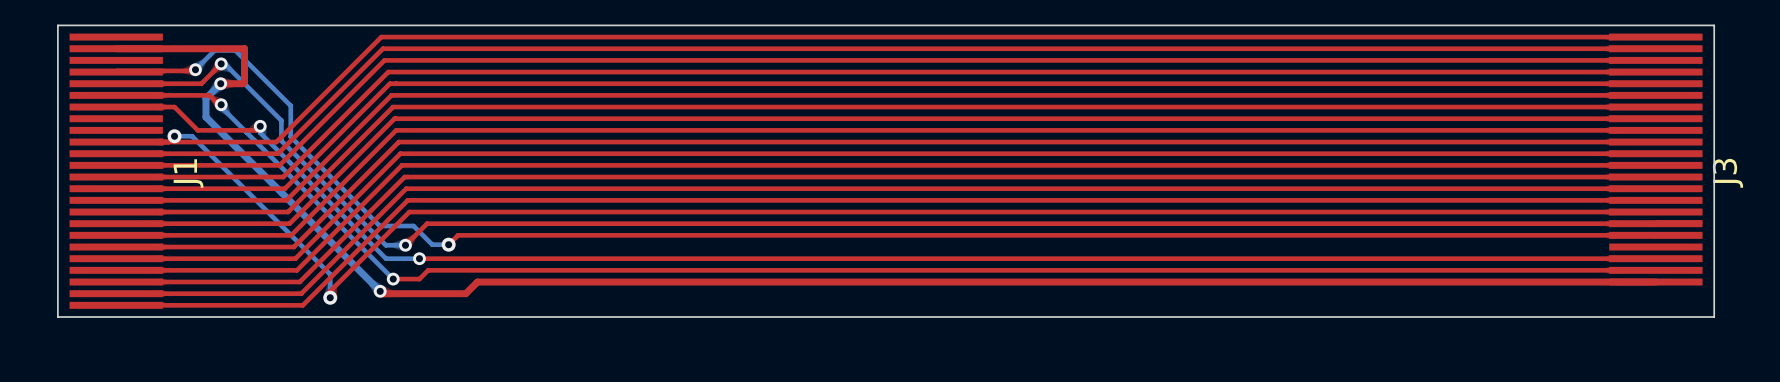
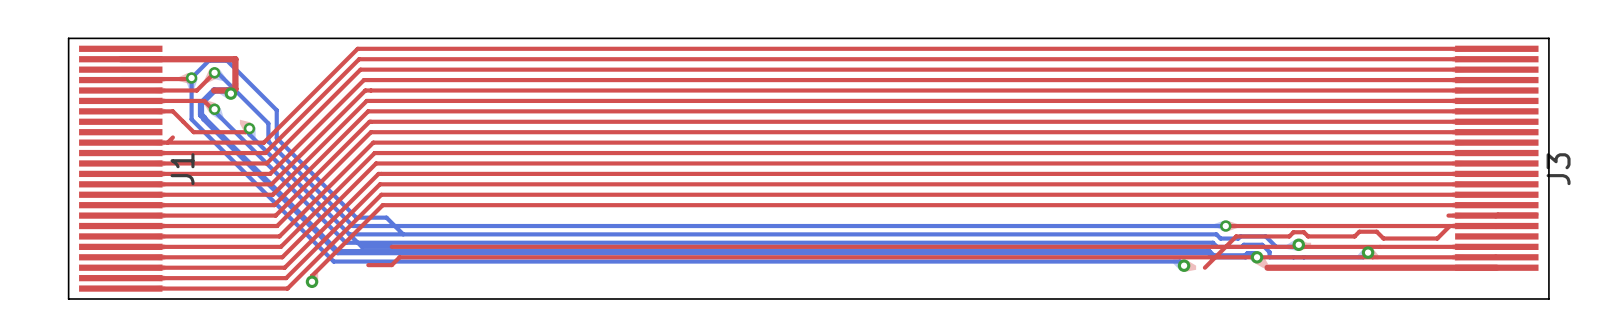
bottom track: none -> (191, 77) (191, 119) (333, 261) (1179, 261) (1184, 265)
via: (220, 83) -> none
bottom track: (206, 111) (206, 117) (380, 291) -> (201, 114) (337, 252) (1209, 252) (1213, 256) (1245, 256) (1247, 254) (1253, 254) (1257, 257)
bottom track: (174, 136) (192, 136) (330, 274) (330, 297) -> none
via position: (174, 136) -> (230, 93)
top track: (1601, 223) (427, 223) (405, 245) -> none
bottom track: (375, 235) (385, 245) (405, 245) -> (352, 226) (1225, 226)
top track: (1352, 235) (457, 235) (448, 244) -> none
via: none -> (1225, 226)
top track: none -> (1449, 226) (1437, 238) (1383, 238) (1376, 231) (1359, 231) (1354, 236) (1308, 236) (1303, 232) (1293, 232) (1289, 236) (1236, 236) (1204, 267)
bottom track: none -> (417, 234) (1216, 234) (1220, 238) (1265, 236) (1276, 246) (1296, 246) (1298, 244)
via: (448, 244) -> none
via: (405, 245) -> none
bottom track: (368, 254) (393, 279) -> (345, 242) (1212, 242) (1217, 246) (1262, 244) (1269, 252) (1269, 257) (1363, 257) (1368, 252)
via: none -> (1298, 244)
via: (419, 258) -> none
via: none -> (1368, 252)
via: none -> (1257, 257)
via: (393, 279) -> none
via: none -> (1184, 265)
top track: (1399, 282) (477, 282) (465, 293) (382, 293) (380, 291) -> none
via: (380, 291) -> none

